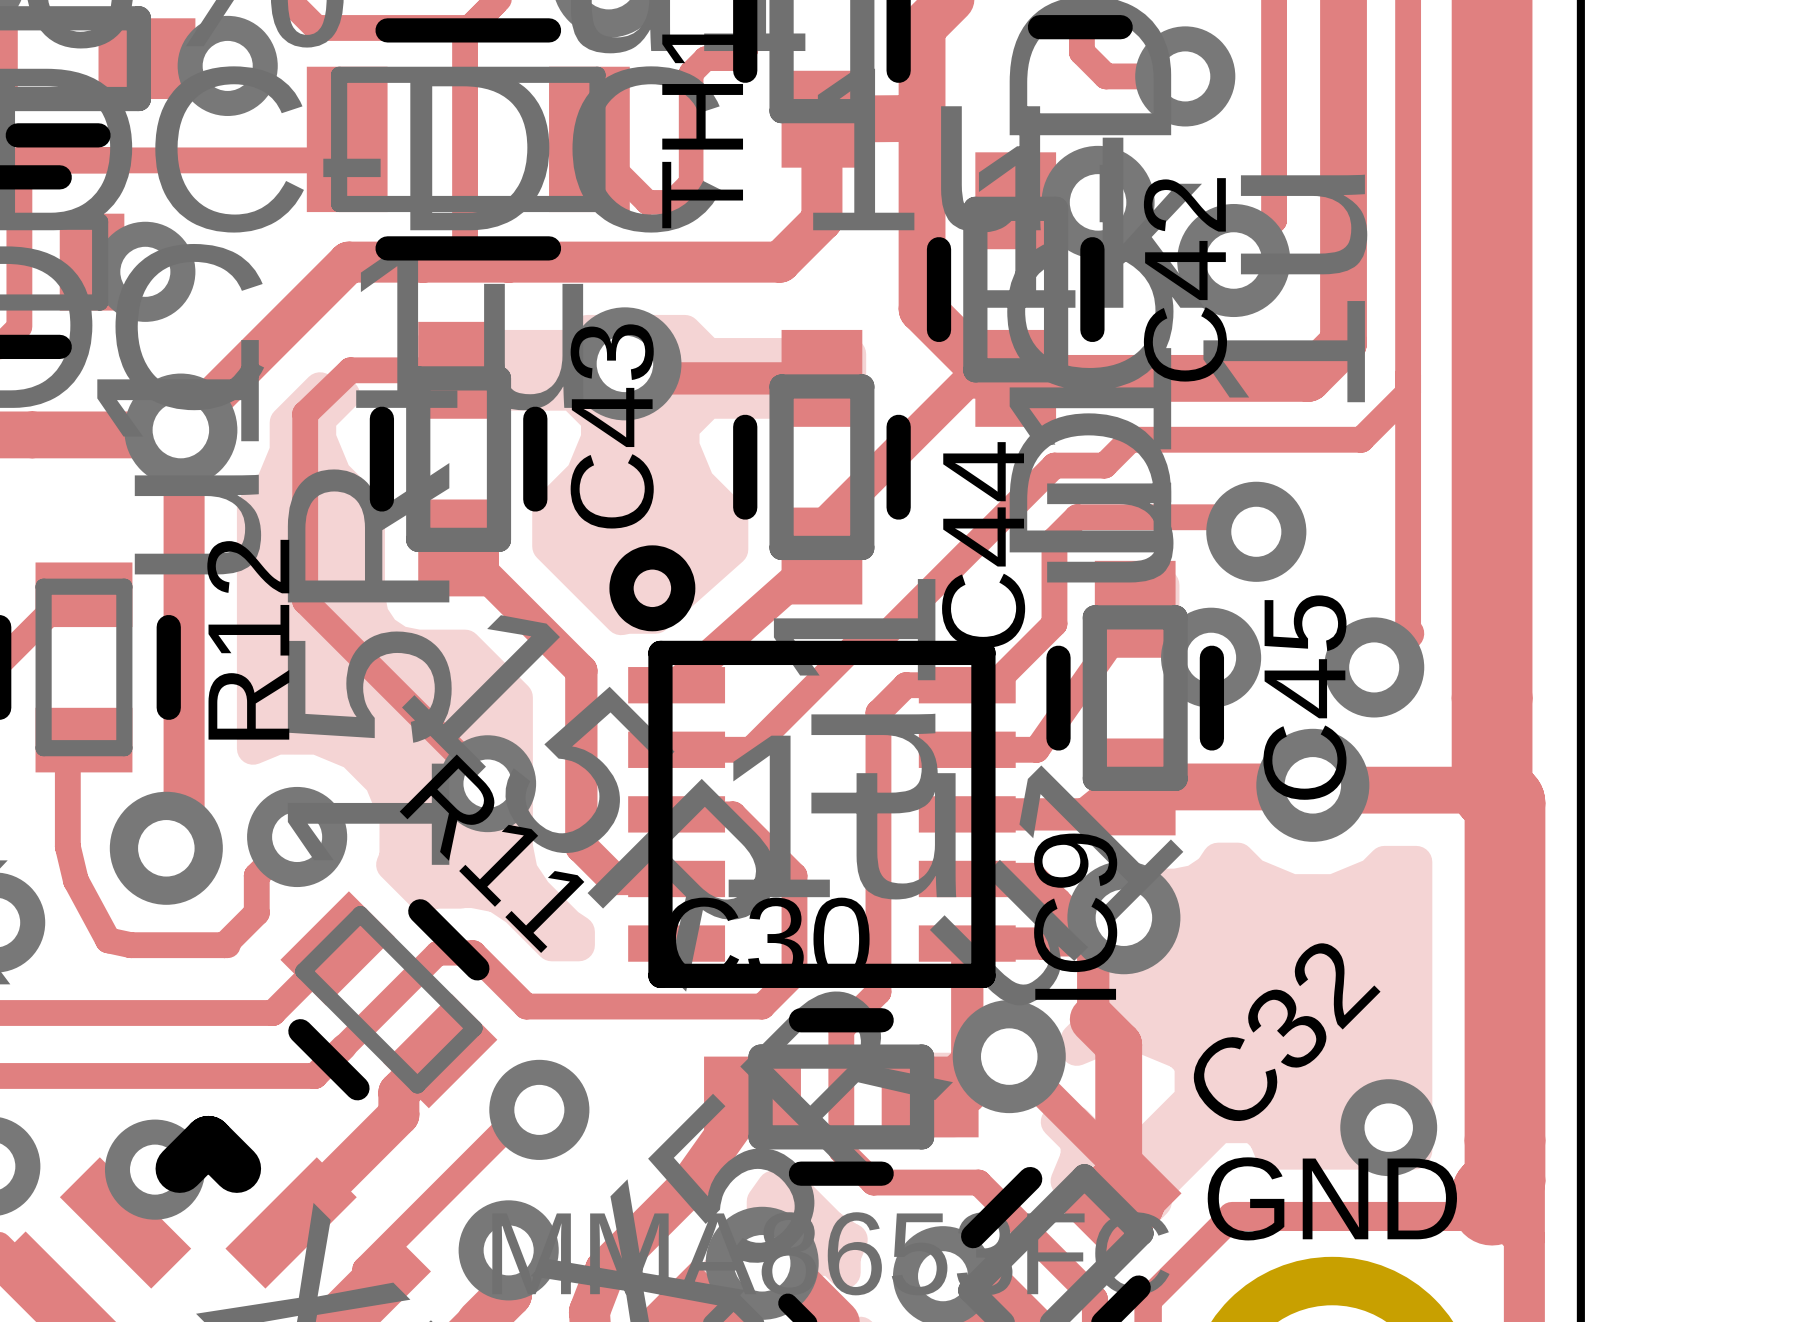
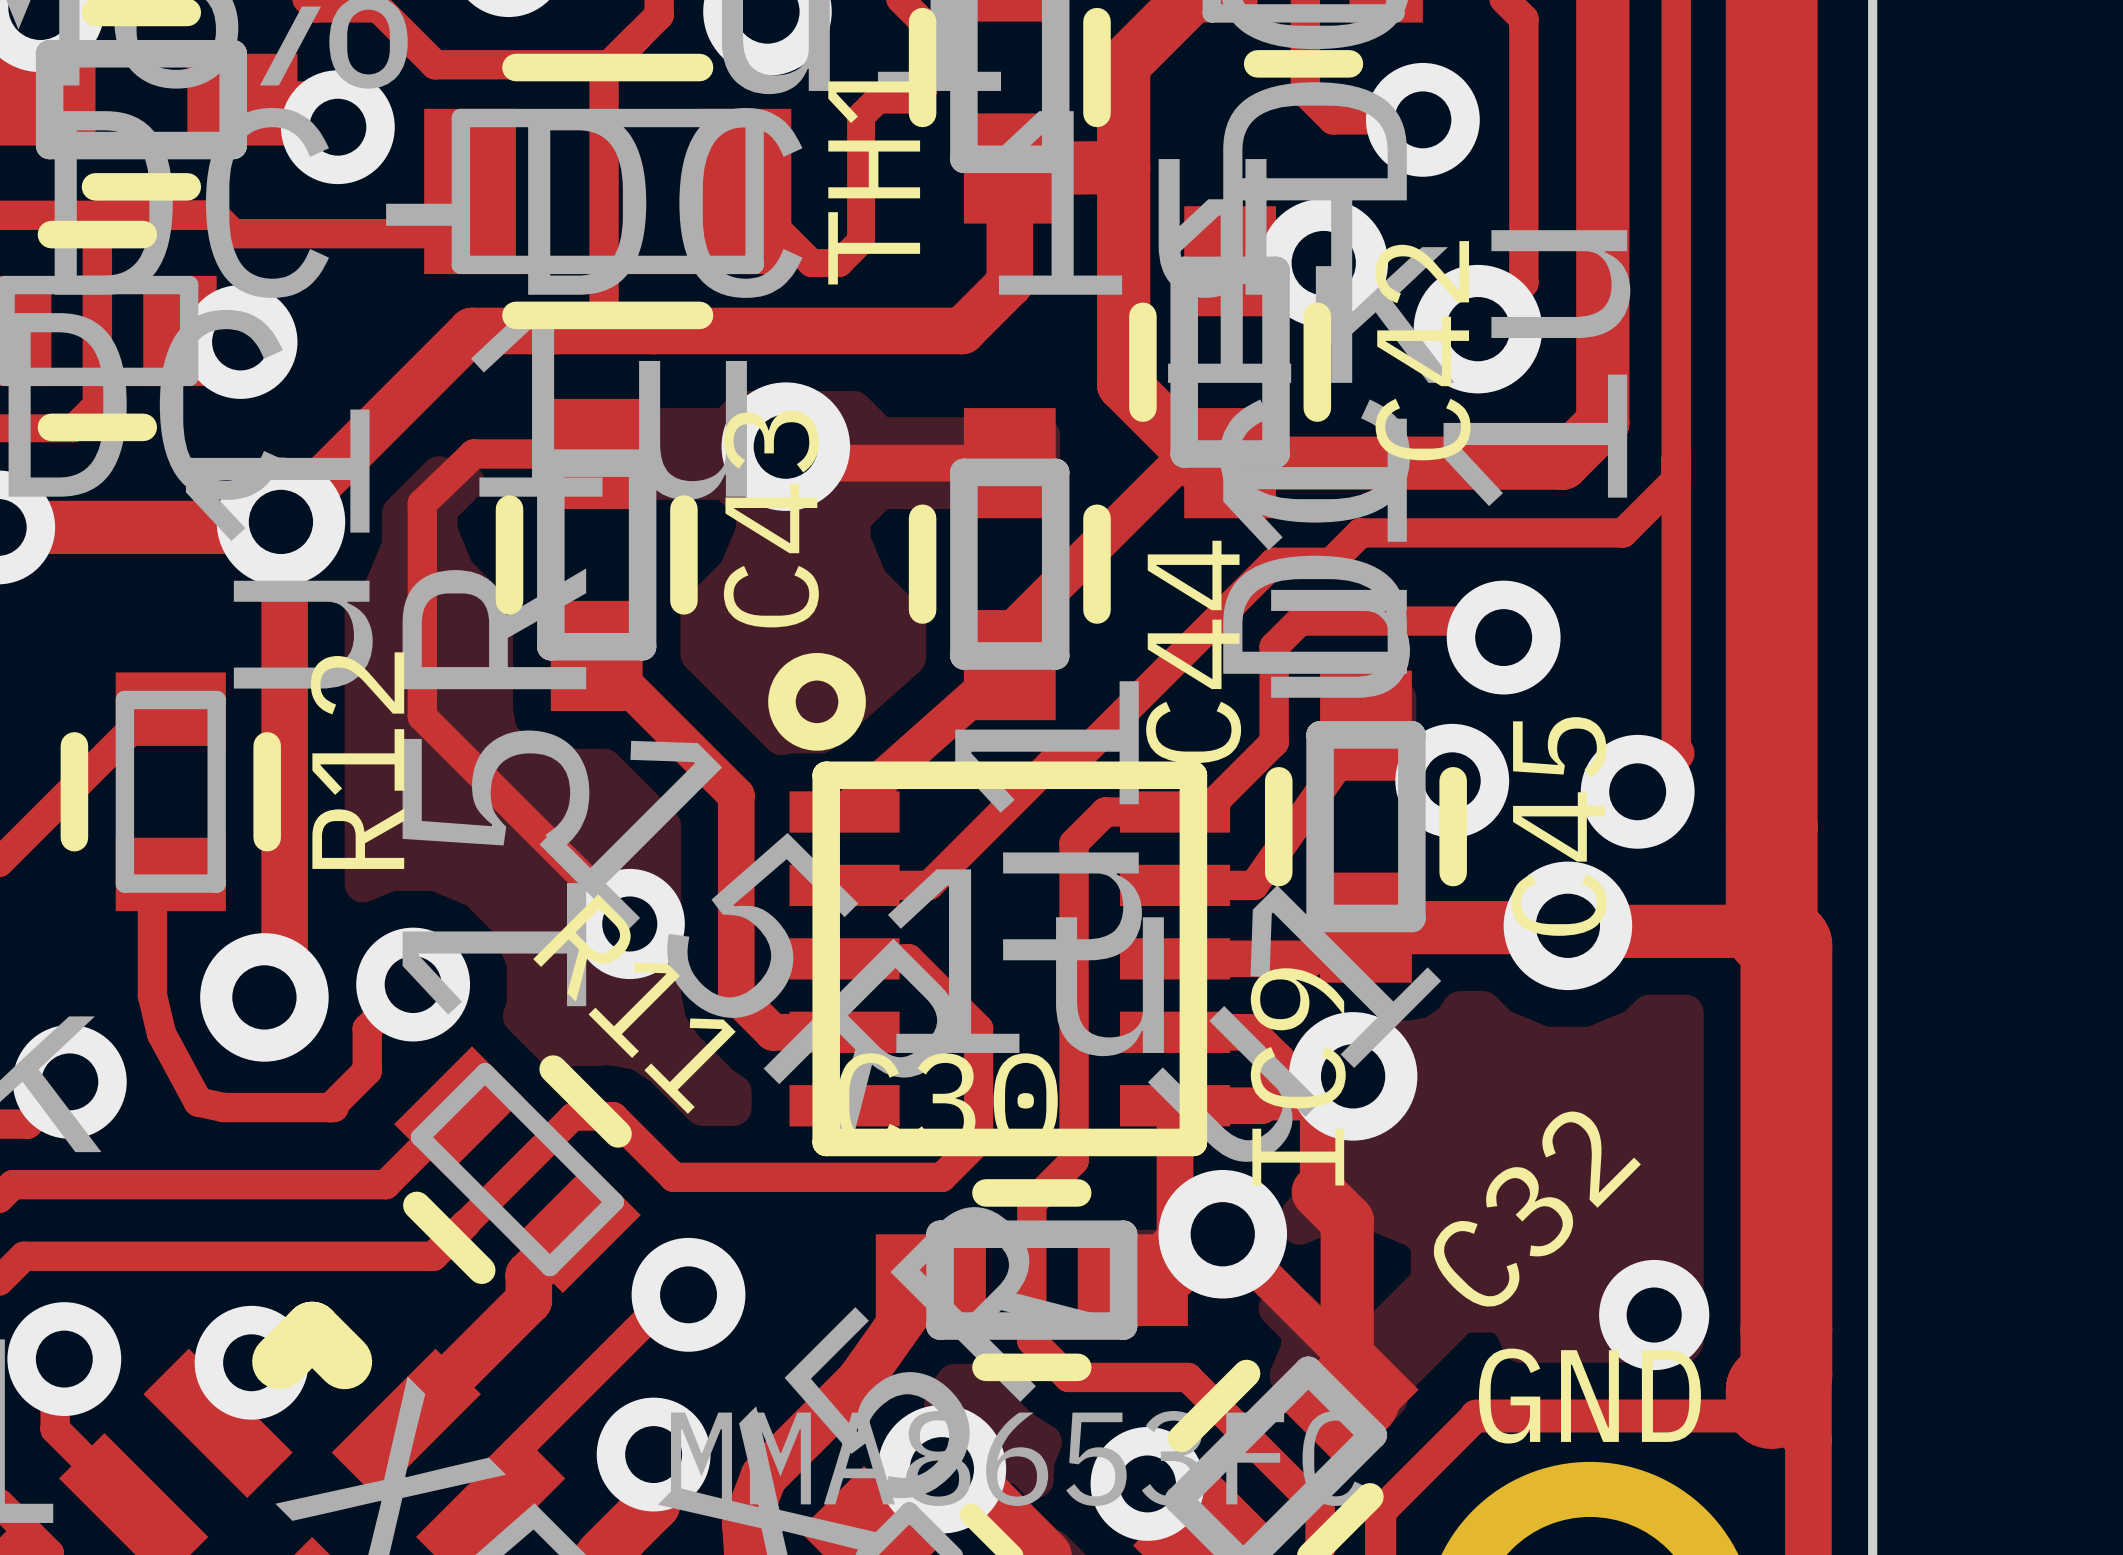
via position: (227, 65) -> (337, 127)
track: (122, 160) (326, 160) -> (214, 215) (233, 233) (427, 233) (446, 215)

